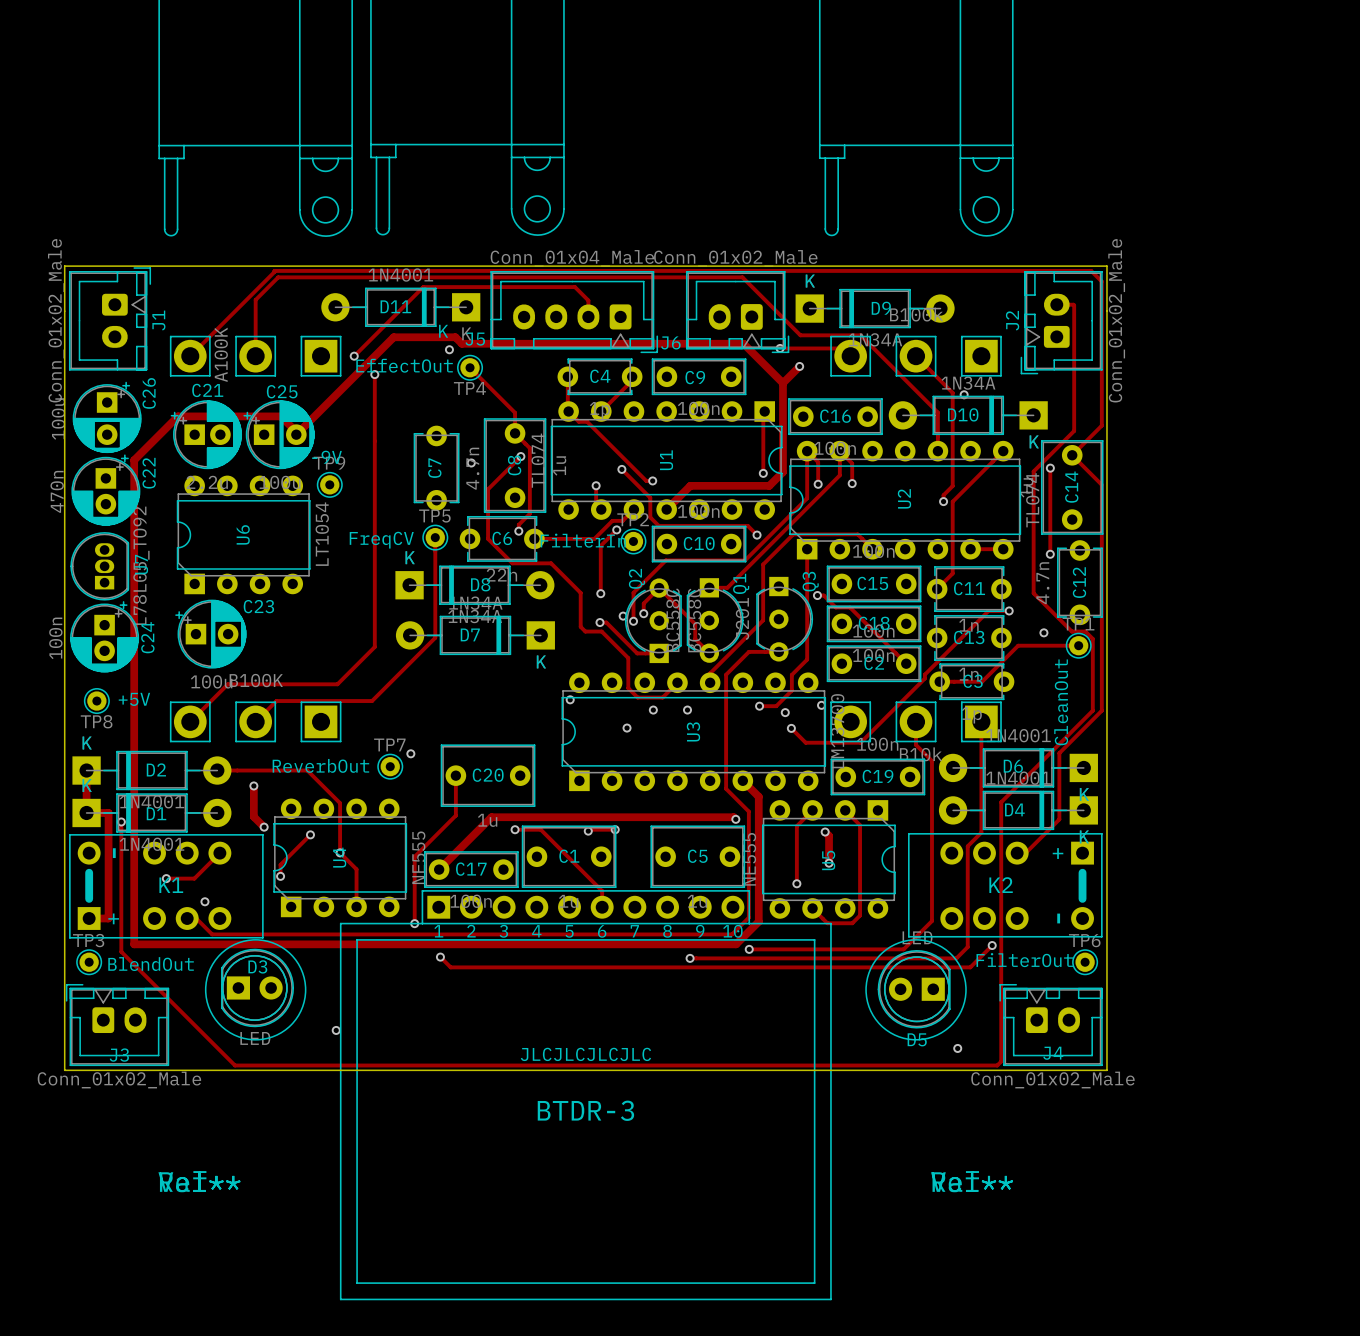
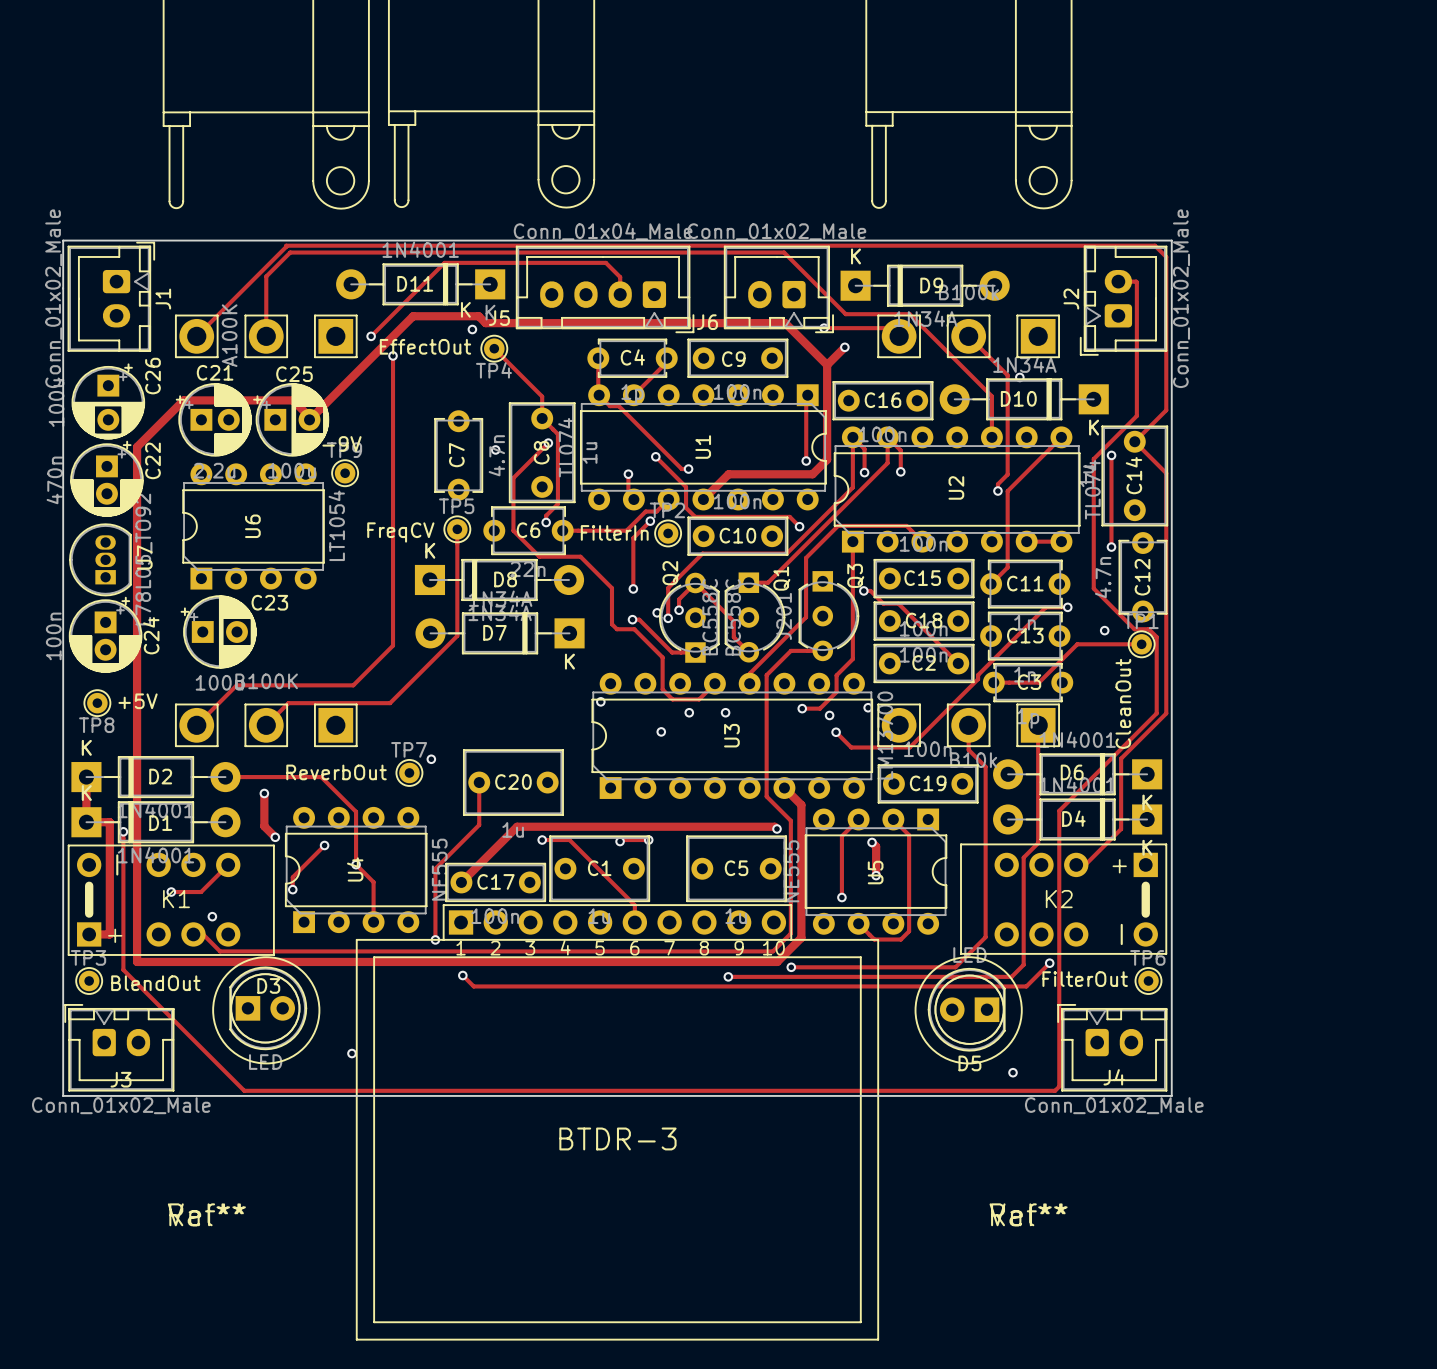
text: JLCJLCJLCJLC (585, 1054) -> none

